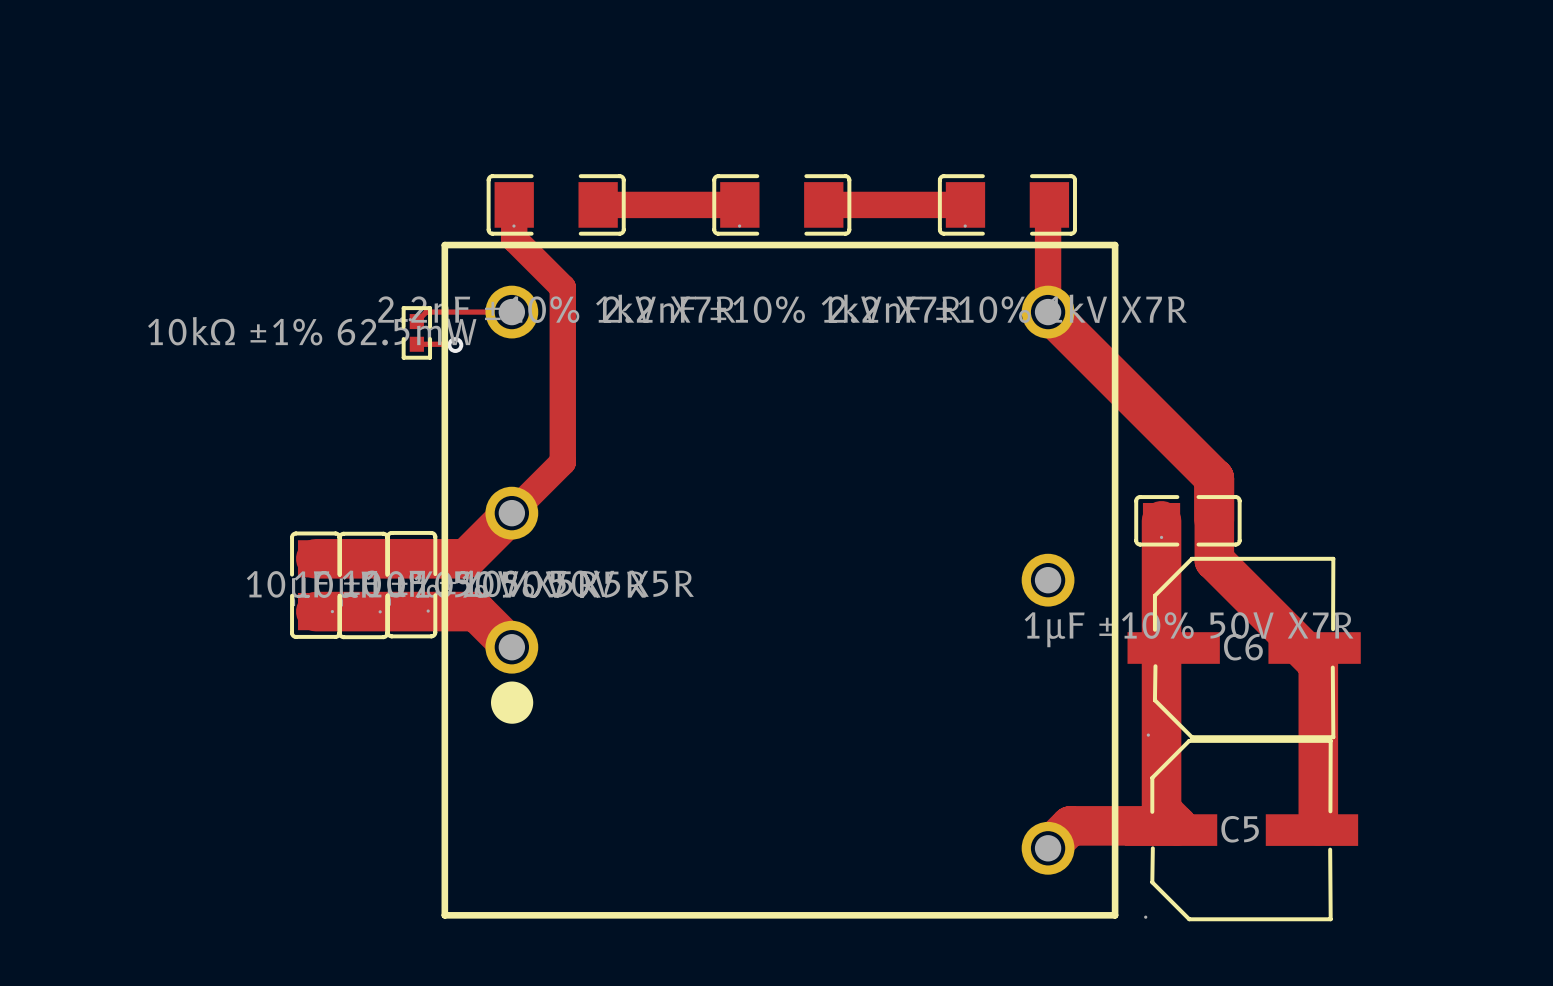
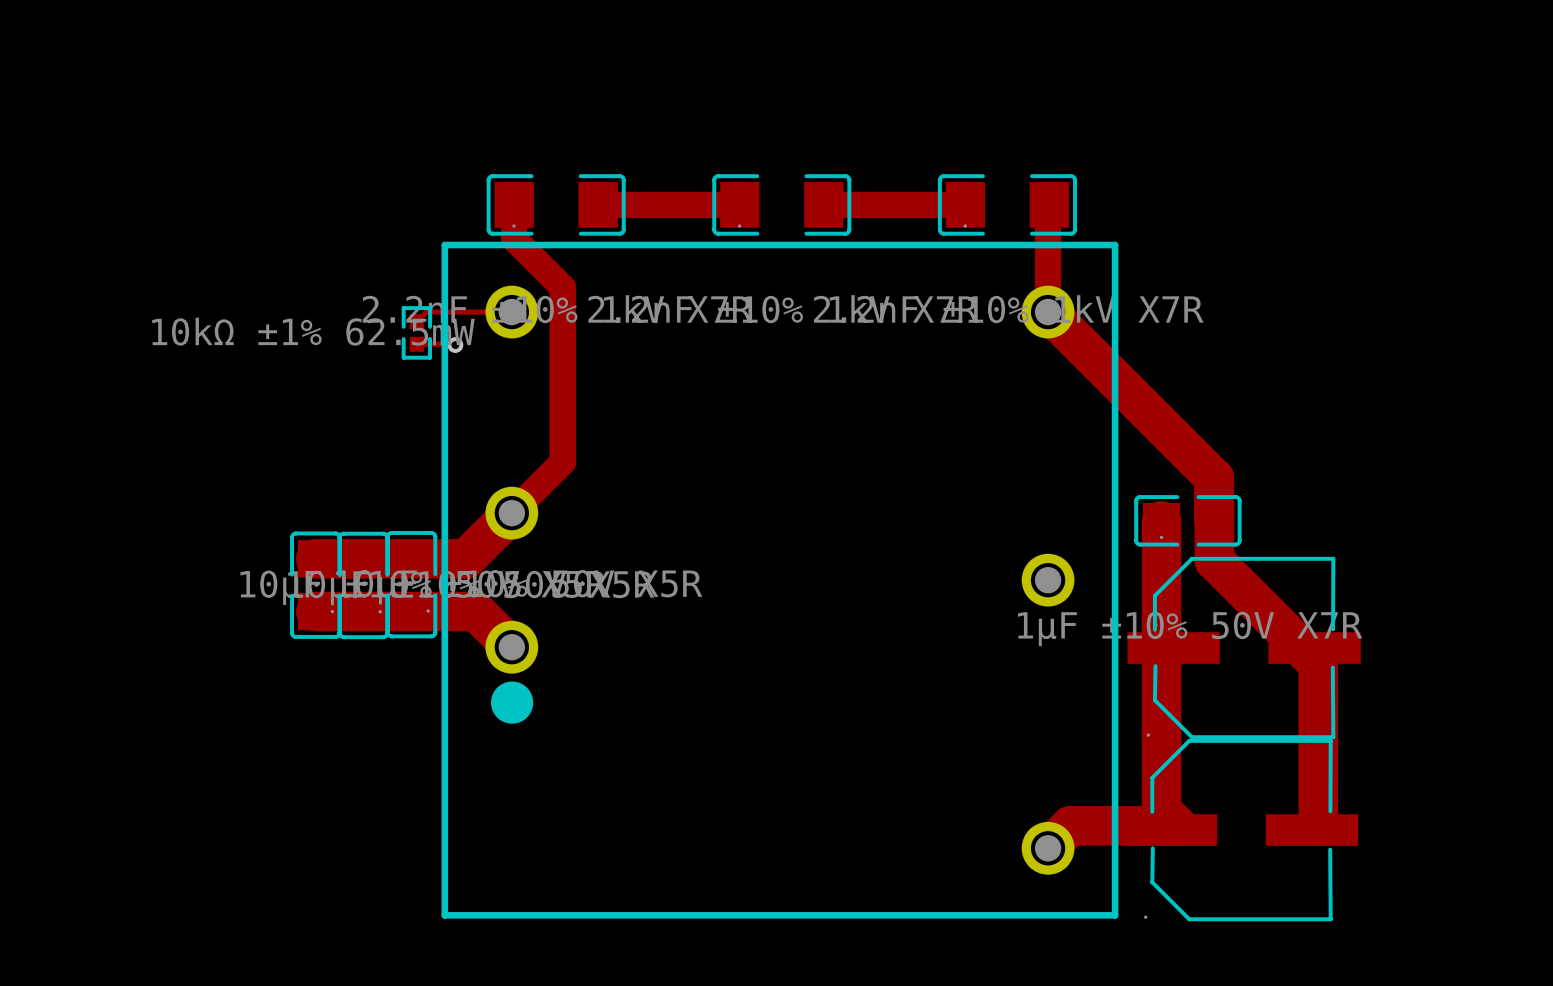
C6 name: C6 (1243, 647) -> none
C5 name: C5 (1240, 829) -> none

